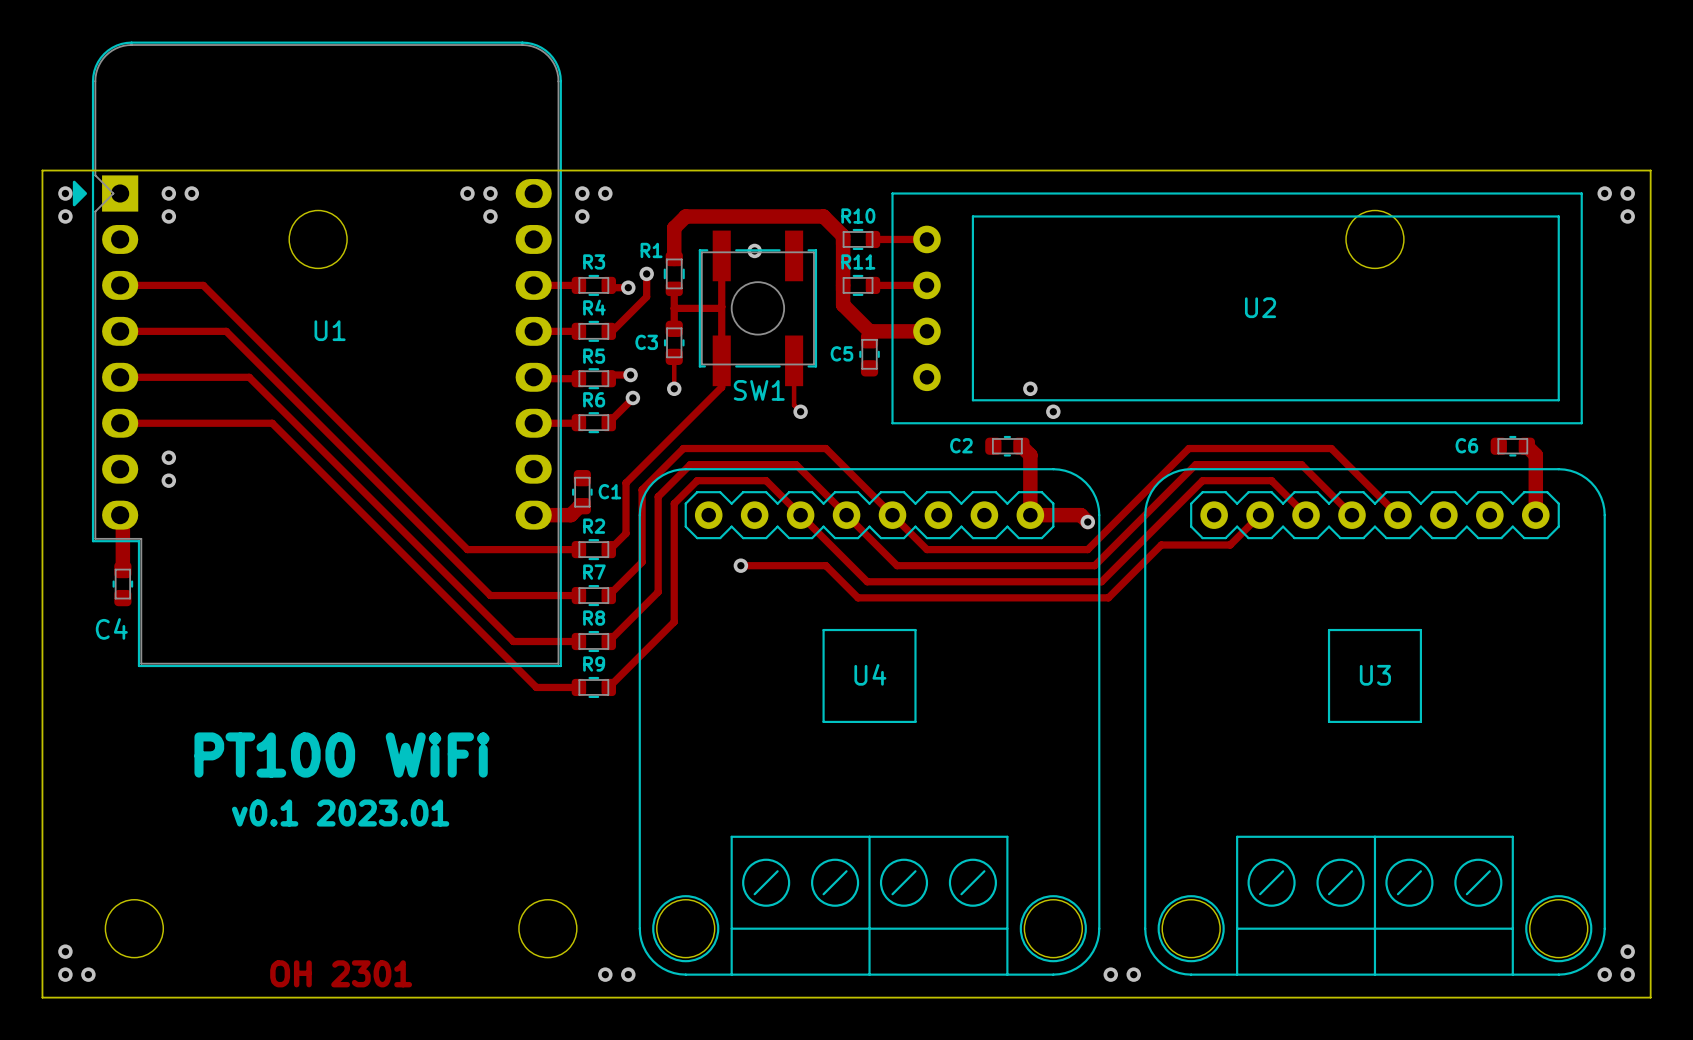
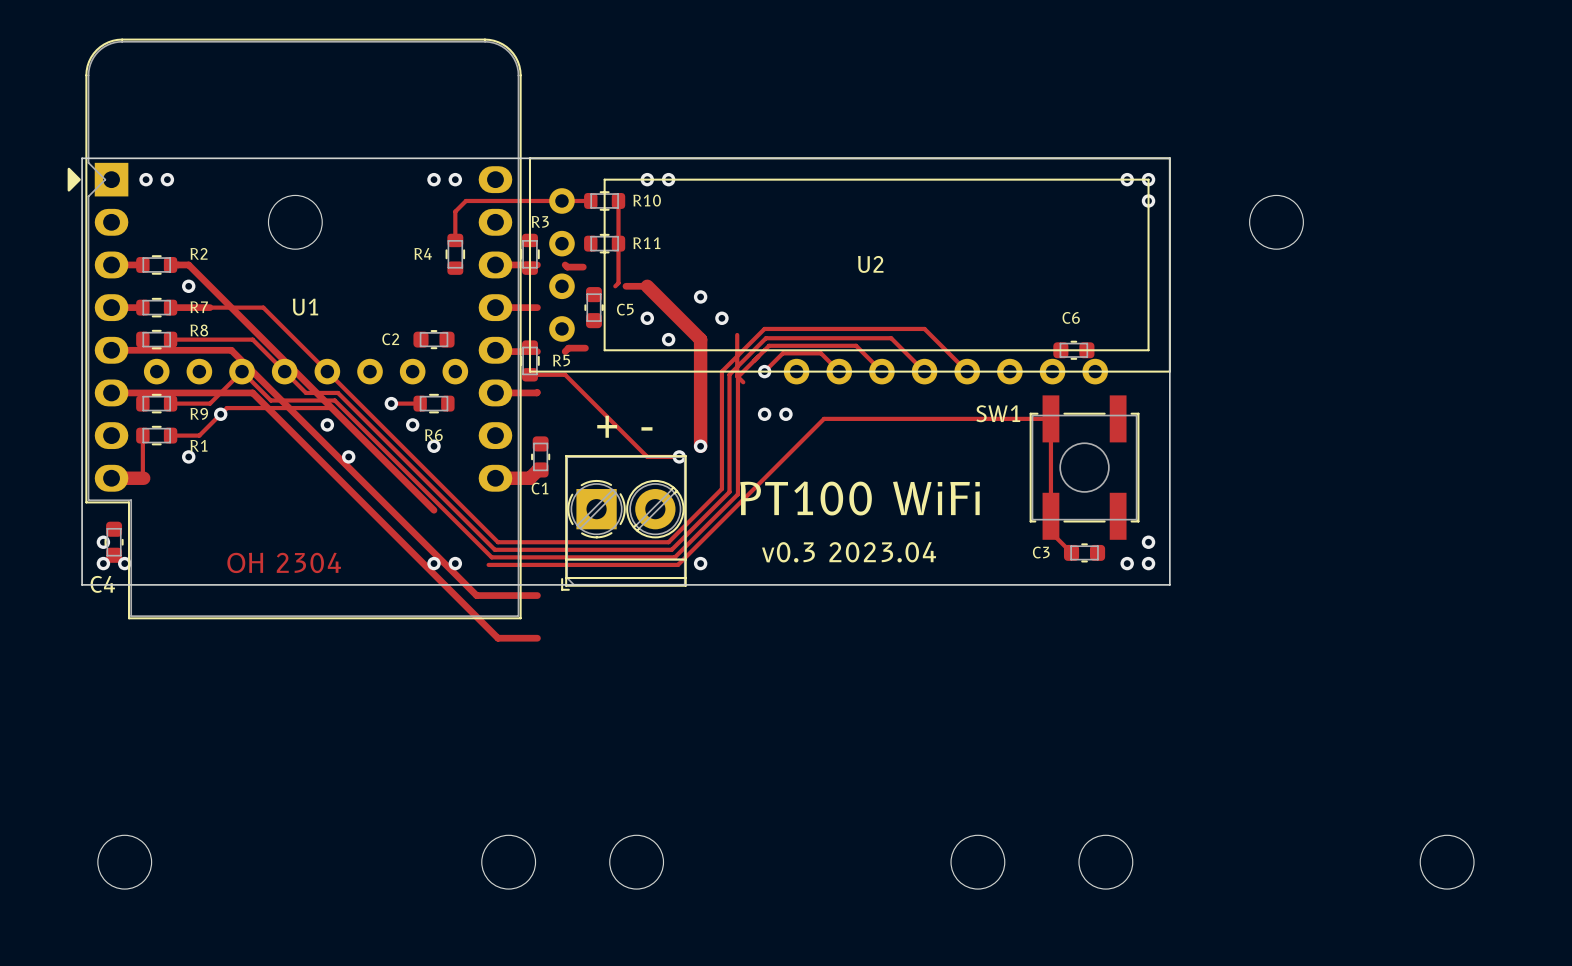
board edge: (88, 170) (42, 170) (42, 997) (1650, 997) (1650, 170) (1260, 170) -> (82, 158) (82, 584) (1169, 584) (1169, 158)
via: (65, 193) -> none
via: none -> (146, 179)
via: (168, 193) -> none
via: none -> (167, 179)
via: (191, 193) -> none
via: (582, 193) -> none
via: (605, 193) -> none
via: none -> (647, 179)
via: none -> (668, 179)
via: none -> (1127, 179)
via: none -> (1148, 179)
via: (1604, 193) -> none
via: (1627, 193) -> none
via: (65, 216) -> none
via: (168, 216) -> none
via: (490, 216) -> none
via: (582, 216) -> none
track: none -> (590, 200) (465, 200) (455, 211) (455, 240)
track: none -> (618, 200) (618, 283) (615, 286)
R10 name position: R10 (858, 216) -> R10 (647, 200)
via: none -> (1148, 200)
via: (1627, 216) -> none
R10 position: (858, 239) -> (604, 200)
track: (872, 239) (926, 239) -> none
R1 name position: R1 (651, 250) -> R1 (199, 445)
via: (754, 250) -> none
track: (721, 255) (721, 387) (626, 482) (626, 533) (608, 549) -> none
track: (674, 258) (674, 227) (685, 216) (823, 216) (843, 236) (843, 304) (869, 331) -> none
R11 name position: R11 (858, 261) -> R11 (646, 243)
track: (646, 273) (646, 296) (612, 331) (608, 331) -> none
via: (646, 273) -> none
R1 rotation: 0° (674, 273) -> 90° clockwise (156, 435)
R1 position: (674, 273) -> (156, 435)
track: (153, 285) (183, 285) -> none
R3 rotation: 0° (593, 285) -> 90° clockwise (529, 254)
R11 position: (858, 285) -> (604, 243)
track: (872, 285) (926, 285) -> none
via: (628, 287) -> none
track: (674, 288) (674, 328) -> none
track: (721, 306) (697, 308) -> (700, 446) (700, 339) (647, 286)
R4 name position: R4 (594, 307) -> R4 (423, 253)
via: none -> (188, 286)
SW1 position: (757, 308) -> (1084, 467)
U2 position: (1237, 308) -> (849, 264)
via: none -> (700, 296)
track: (153, 331) (183, 331) -> none
track: (226, 331) (490, 595) (578, 595) -> (210, 307) (263, 307) (497, 542) (668, 542) (721, 488) (721, 371) (764, 328) (924, 328) (967, 371)
R4 rotation: 0° (593, 331) -> 90° clockwise (455, 254)
R4 position: (593, 331) -> (455, 254)
track: (869, 331) (926, 331) -> none
C3 rotation: 0° (674, 342) -> 90° clockwise (1084, 552)
C3 position: (674, 342) -> (1084, 552)
via: none -> (647, 318)
via: none -> (721, 318)
C5 name position: C5 (841, 353) -> C5 (625, 309)
C5 position: (869, 354) -> (593, 307)
track: (674, 356) (674, 388) -> none
track: none -> (170, 339) (252, 339) (306, 392) (338, 392) (494, 549) (671, 549) (729, 492) (729, 374) (765, 338) (891, 338) (924, 371)
via: none -> (668, 339)
via: (630, 375) -> none
R5 rotation: 0° (593, 378) -> 90° clockwise (529, 360)
via: (674, 388) -> none
via: (1030, 388) -> none
SW1 name position: SW1 (759, 390) -> SW1 (998, 413)
track: (632, 397) (608, 422) -> none
via: (632, 397) -> none
R6 name position: R6 (594, 399) -> R6 (433, 435)
part: none -> (306, 371)
track: none -> (764, 371) (782, 353) (821, 353) (839, 371)
via: none -> (764, 371)
track: none -> (881, 371) (856, 345) (769, 345) (737, 376) (737, 494) (674, 557) (491, 557) (334, 400) (270, 400) (242, 371) (210, 403) (170, 403)
part: none -> (945, 371)
track: none -> (529, 374) (565, 374) (647, 456) (679, 456)
via: (800, 411) -> none
via: (1053, 411) -> none
R6 position: (593, 422) -> (434, 403)
track: none -> (391, 403) (420, 403)
via: none -> (391, 403)
track: none -> (331, 408) (226, 408) (199, 435) (170, 435)
C6 name position: C6 (1466, 445) -> C6 (1071, 317)
via: none -> (220, 414)
via: none -> (764, 414)
via: none -> (785, 414)
C2 position: (1007, 446) -> (434, 339)
track: (1021, 446) (1030, 455) (1030, 515) (1080, 515) (1087, 522) -> none
C6 position: (1512, 446) -> (1073, 350)
track: (1526, 446) (1535, 455) (1535, 515) -> none
via: (168, 457) -> none
via: none -> (327, 424)
via: none -> (412, 424)
text: none -> + - (624, 426)
track: none -> (142, 435) (143, 478) (111, 478)
via: (168, 480) -> none
via: none -> (434, 446)
via: none -> (700, 446)
C1 name position: C1 (609, 491) -> C1 (540, 488)
via: none -> (188, 456)
via: none -> (348, 456)
via: none -> (679, 456)
track: (1260, 515) (1230, 545) (1161, 545) (1108, 597) (858, 597) (825, 565) (740, 565) -> none
track: (1306, 515) (1271, 480) (1202, 480) (1101, 581) (867, 581) (766, 480) (697, 480) (674, 503) (674, 621) (608, 687) -> none
track: (1351, 515) (1301, 464) (1195, 464) (1094, 565) (897, 565) (796, 464) (690, 464) (658, 496) (658, 592) (608, 641) -> none
track: (1397, 515) (1331, 448) (1188, 448) (1087, 549) (926, 549) (825, 448) (683, 448) (642, 489) (642, 562) (608, 595) -> none
track: (122, 517) (122, 570) -> none
via: (1087, 522) -> none
R2 name position: R2 (594, 526) -> R2 (199, 253)
text: none -> PT100 WiFi (860, 498)
track: (467, 549) (578, 549) -> none
R2 position: (593, 549) -> (156, 264)
part: none -> (623, 522)
via: (740, 565) -> none
R7 name position: R7 (594, 572) -> R7 (199, 307)
via: none -> (103, 542)
via: none -> (1148, 542)
text: none -> v0.3 2023.04 (849, 552)
R7 position: (593, 595) -> (156, 307)
track: none -> (1071, 552) (1050, 532) (1050, 418) (824, 418) (678, 564) (488, 564)
text: none -> OH 2304 (284, 562)
via: none -> (103, 563)
via: none -> (124, 563)
via: none -> (434, 563)
via: none -> (455, 563)
via: none -> (700, 563)
via: none -> (1127, 563)
via: none -> (1148, 563)
R8 name position: R8 (594, 618) -> R8 (199, 330)
R8 position: (593, 641) -> (156, 339)
R9 name position: R9 (594, 664) -> R9 (199, 413)
R9 position: (593, 687) -> (156, 403)
U4: (869, 721) -> none
U3: (1374, 721) -> none
text: PT100 WiFi (341, 755) -> none
text: v0.1 2023.01 (340, 813) -> none
via: (65, 951) -> none
via: (1627, 951) -> none
text: OH 2301 (341, 973) -> none
via: (65, 974) -> none
via: (88, 974) -> none
via: (605, 974) -> none
via: (628, 974) -> none
via: (1110, 974) -> none
via: (1133, 974) -> none
via: (1604, 974) -> none
via: (1627, 974) -> none

